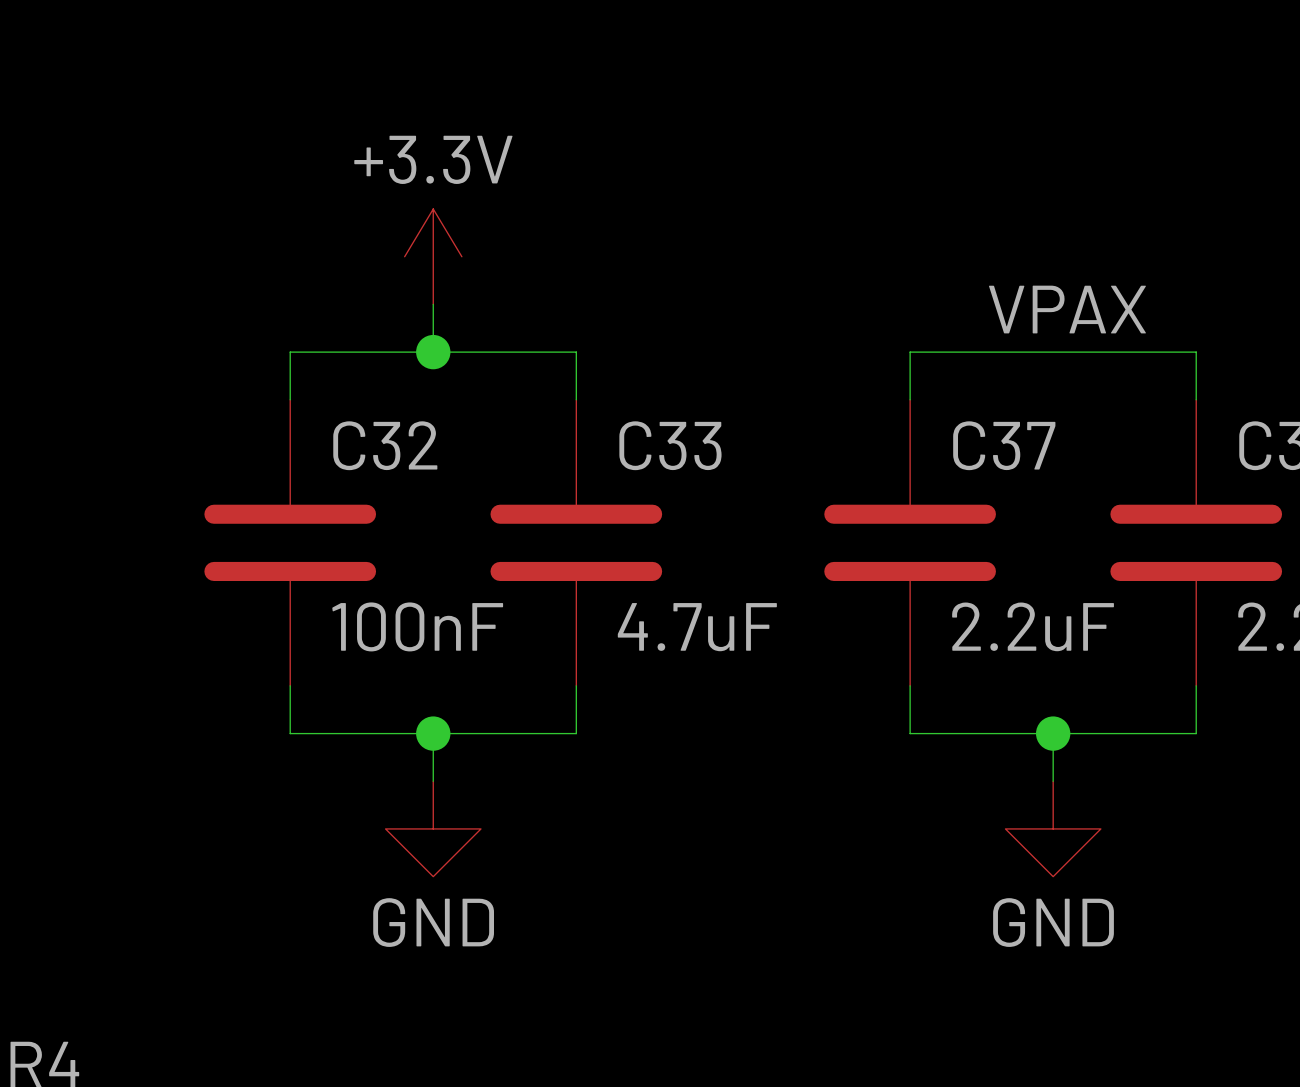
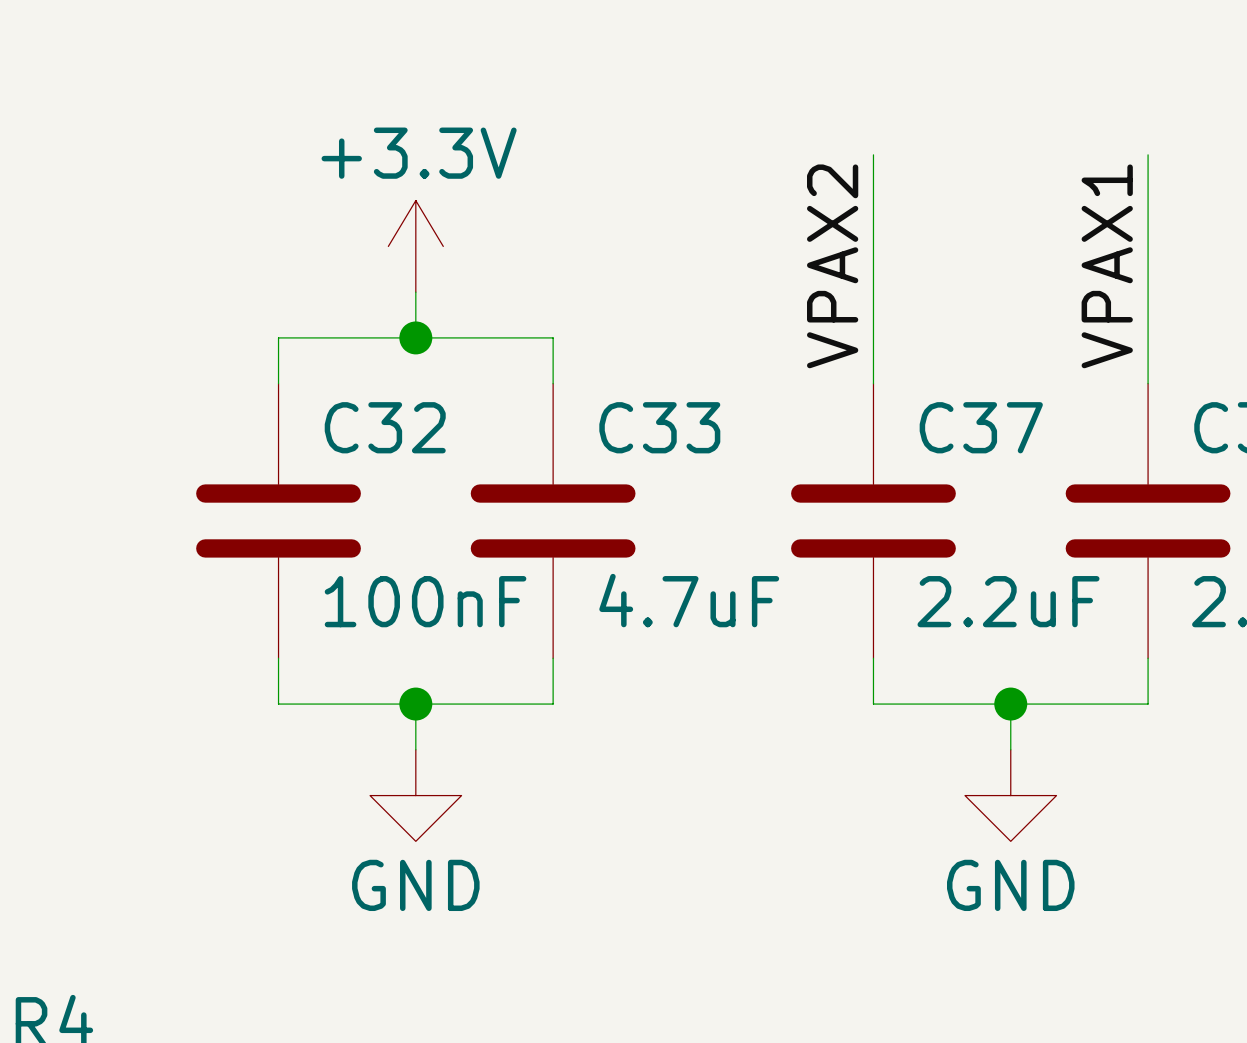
wire: none -> (1148, 154) (1148, 337)
label: none -> VPAX2 (832, 266)
label: VPAX (1067, 309) -> VPAX1 (1107, 266)
wire: (910, 352) (1196, 352) -> (873, 337) (873, 154)

